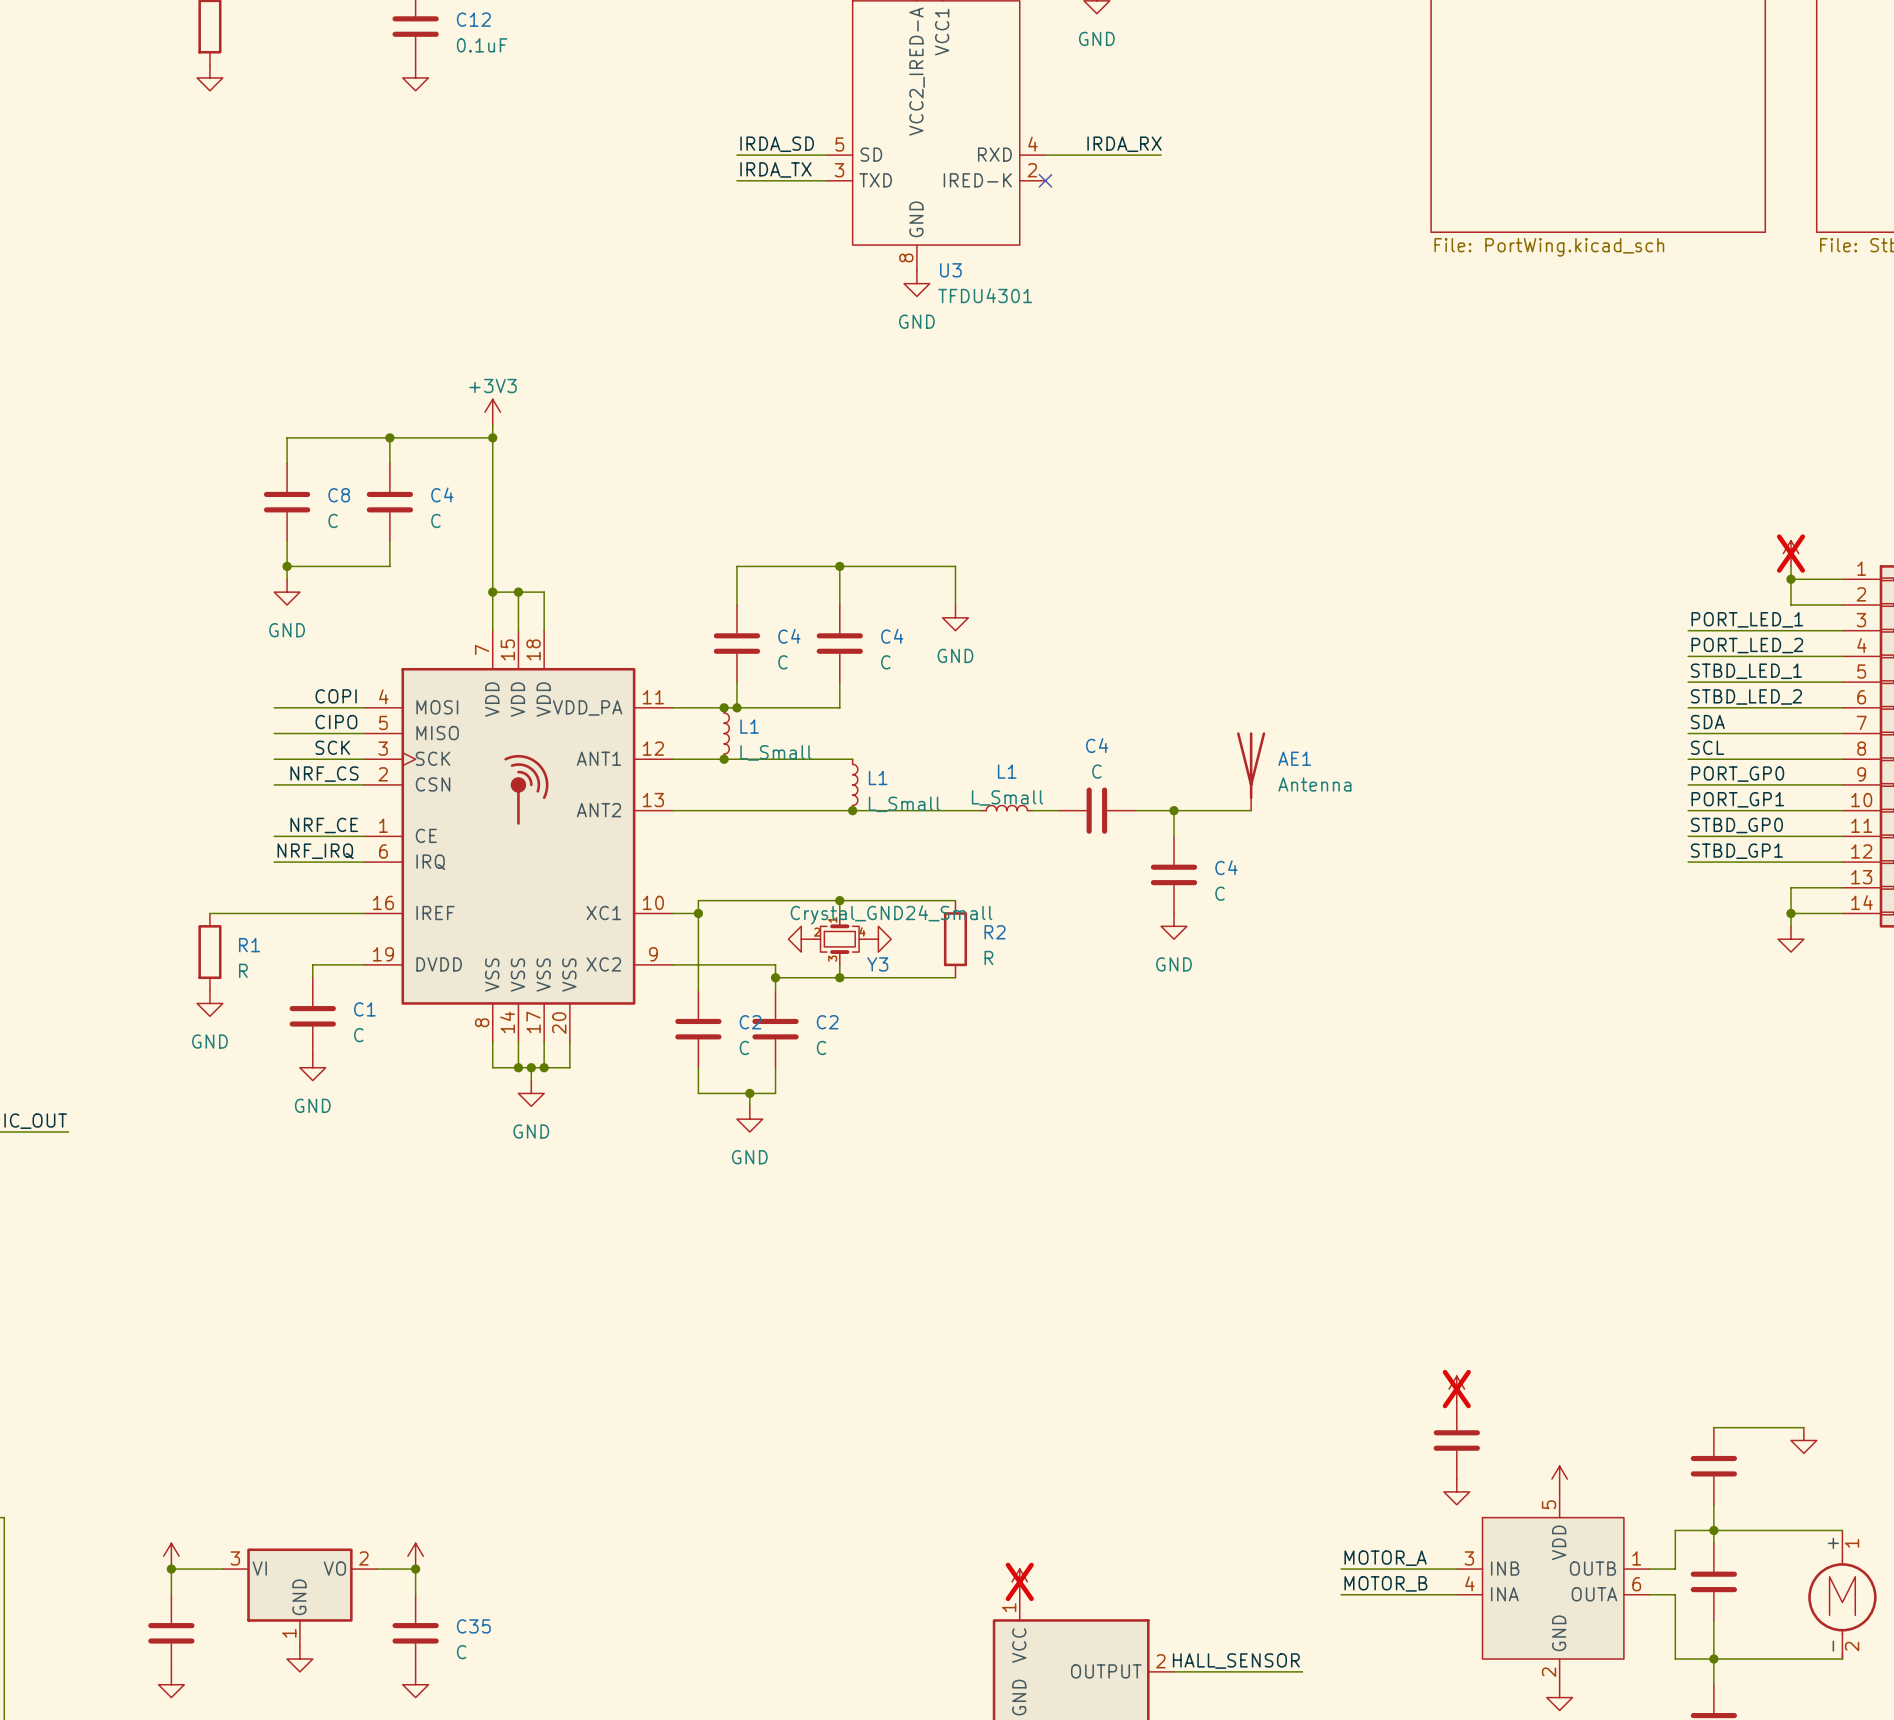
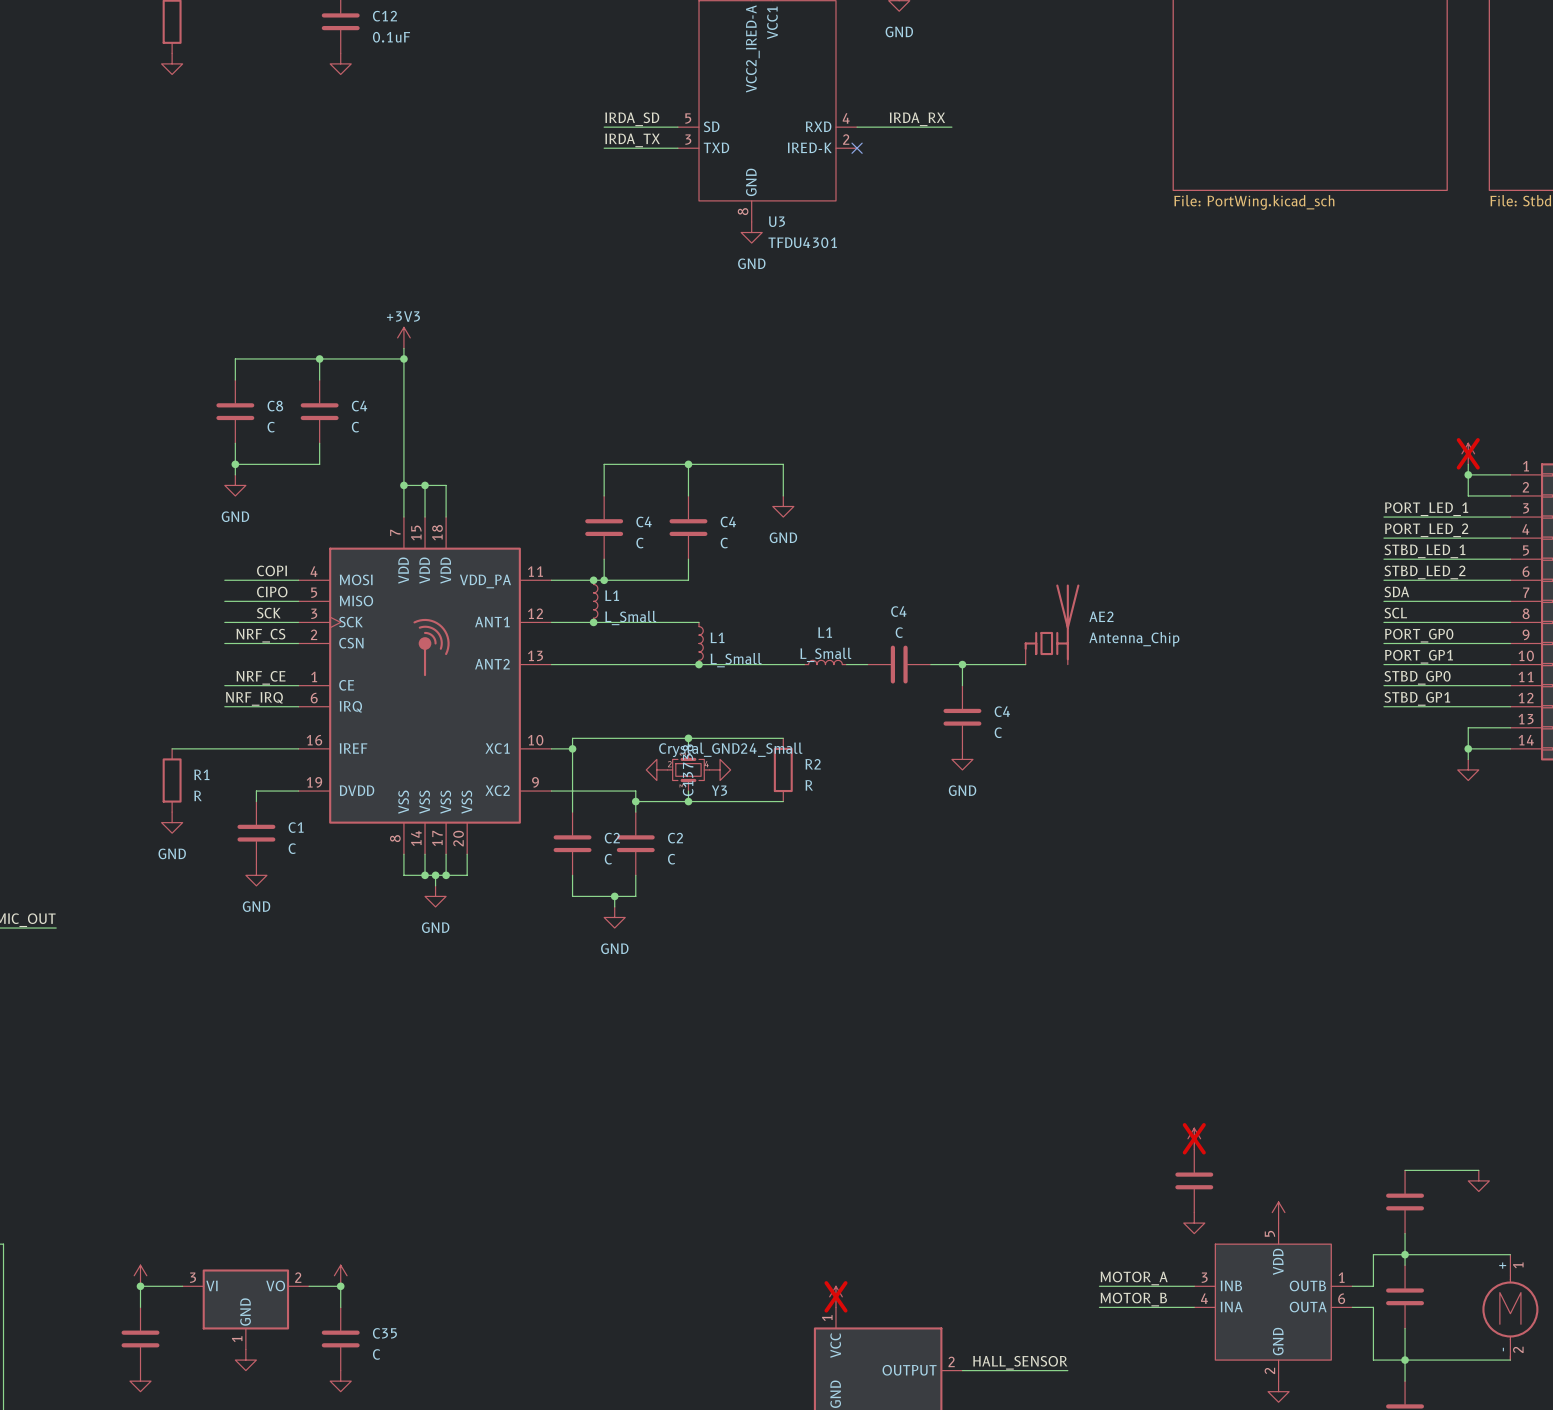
AE2: none -> Antenna_Chip (1052, 624)
AE1: Antenna (1251, 771) -> none
Y3 text: none -> C13738 (688, 770)

